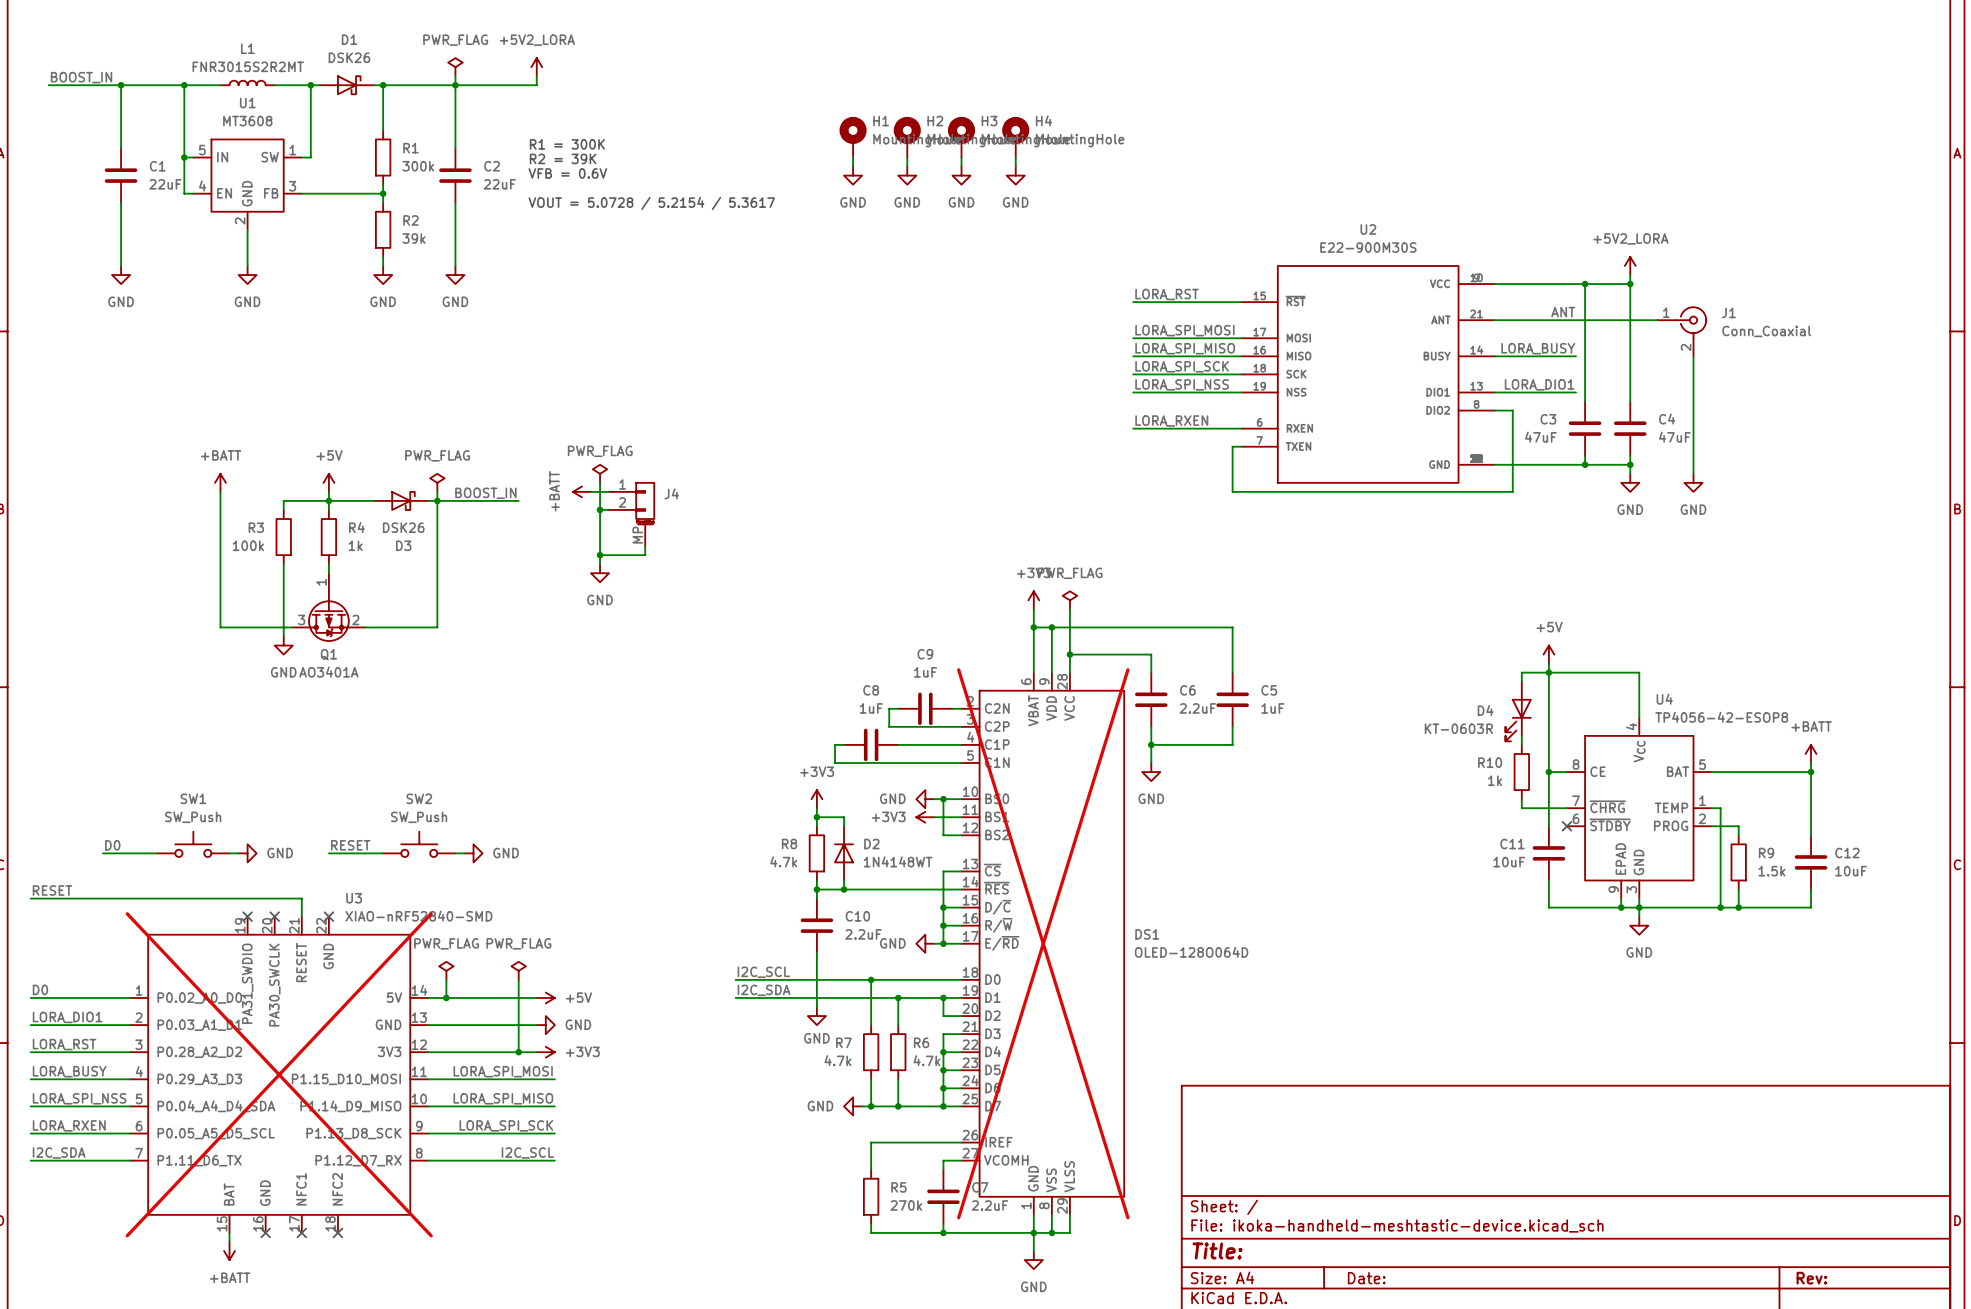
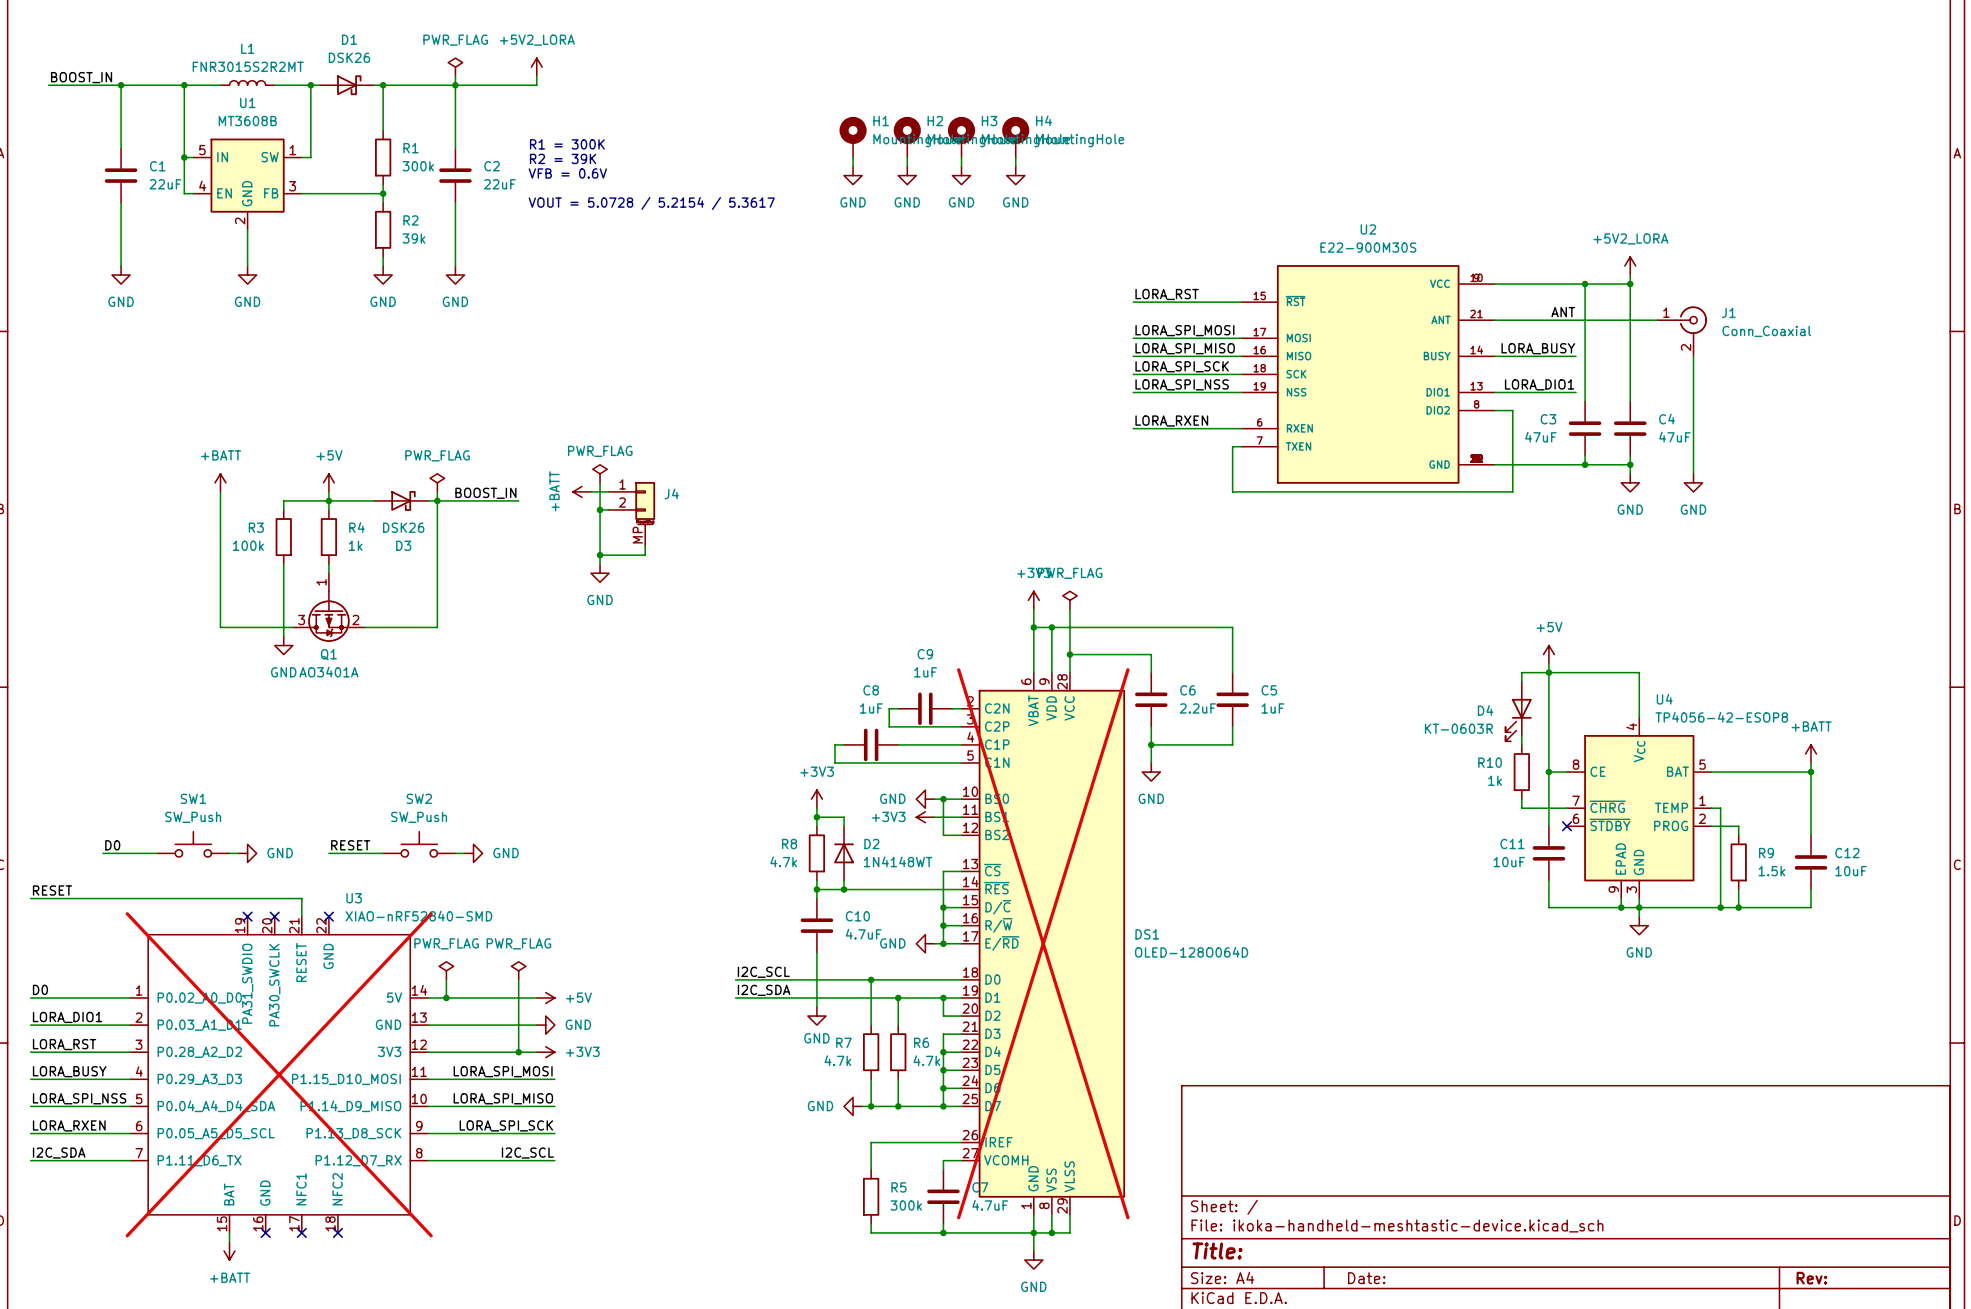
U1 value: MT3608 (247, 121) -> MT3608B (247, 121)
C10 value: 2.2uF (863, 934) -> 4.7uF (863, 934)
R5 value: 270k (906, 1205) -> 300k (906, 1205)
C7 value: 2.2uF (989, 1205) -> 4.7uF (990, 1205)

